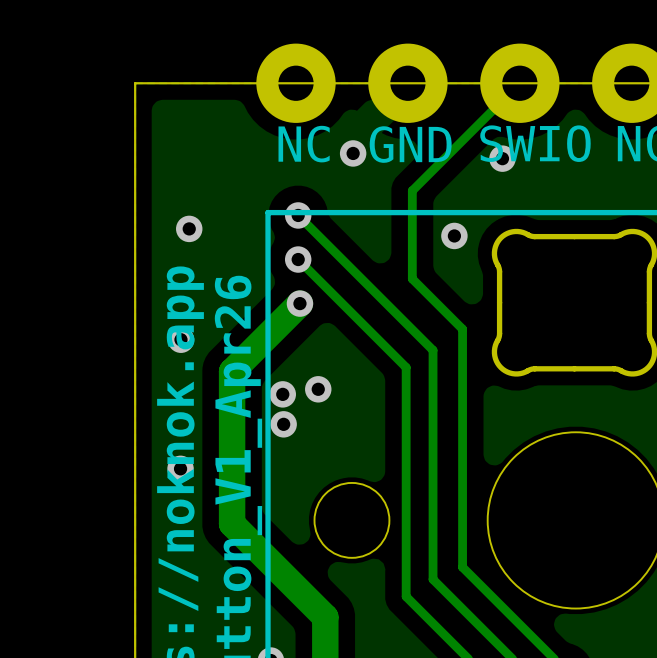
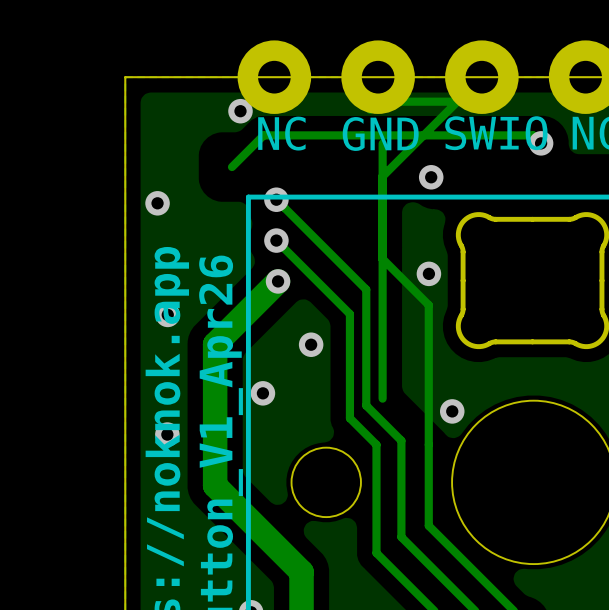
track: none -> (457, 101) (378, 101) (370, 109)
via: none -> (240, 111)
via: (353, 153) -> none
track: none -> (382, 143) (382, 398)
track: none -> (534, 143) (541, 143) (533, 135) (263, 135) (231, 167)
via: none -> (541, 143)
via: (502, 158) -> none
via: none -> (431, 177)
via position: (189, 228) -> (157, 203)
via: (454, 235) -> none
via: none -> (428, 273)
track: (395, 312) (433, 350) (433, 475) -> (366, 289) (366, 405) (401, 440)
track: (377, 338) (406, 367) (406, 479) -> (349, 314) (349, 418) (376, 444)
via position: (318, 389) -> (311, 344)
via: (282, 394) -> none
via: none -> (452, 411)

